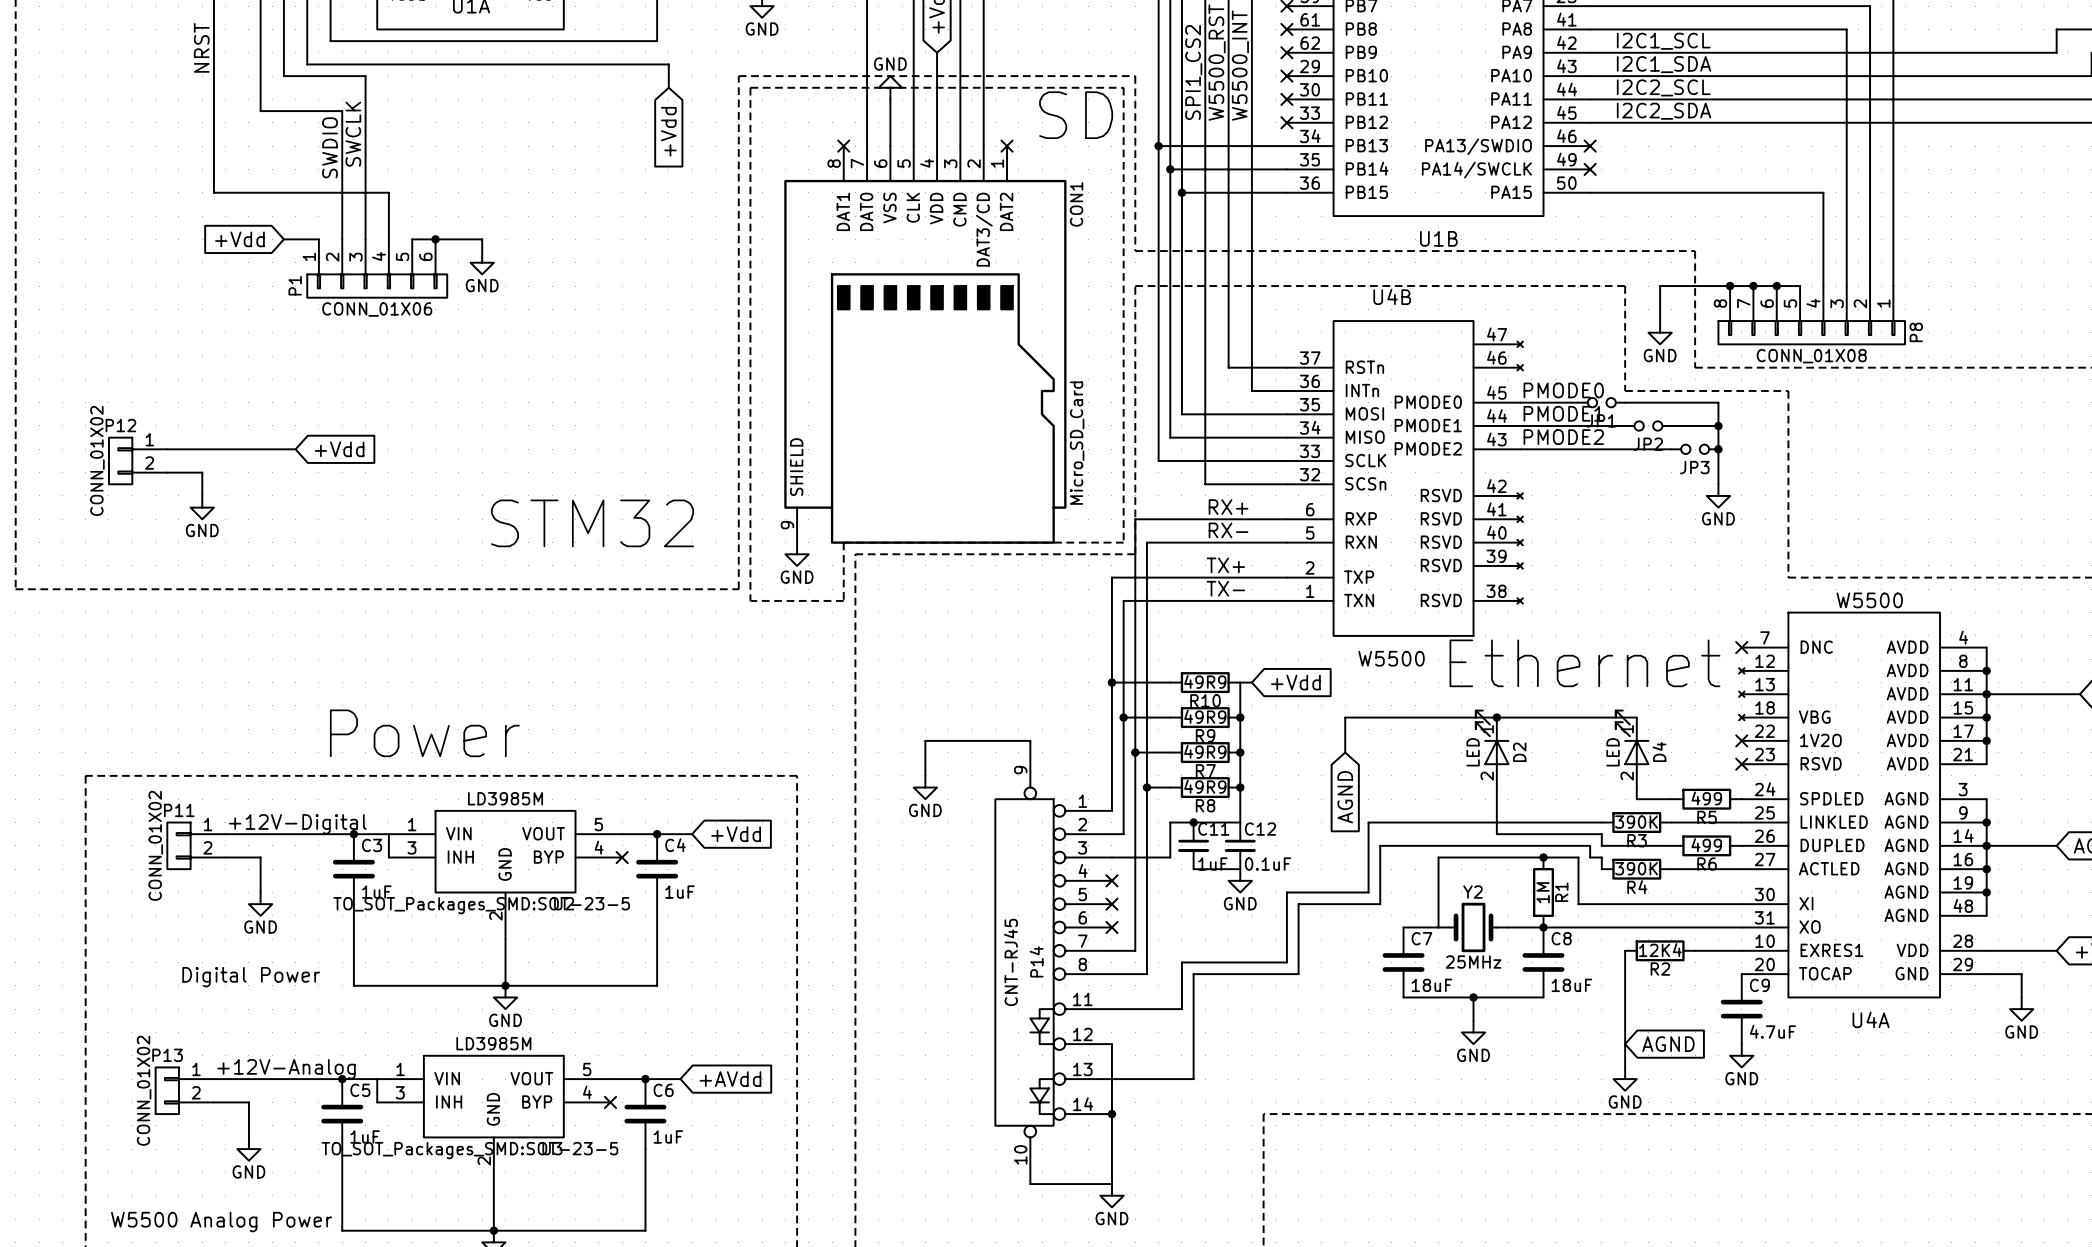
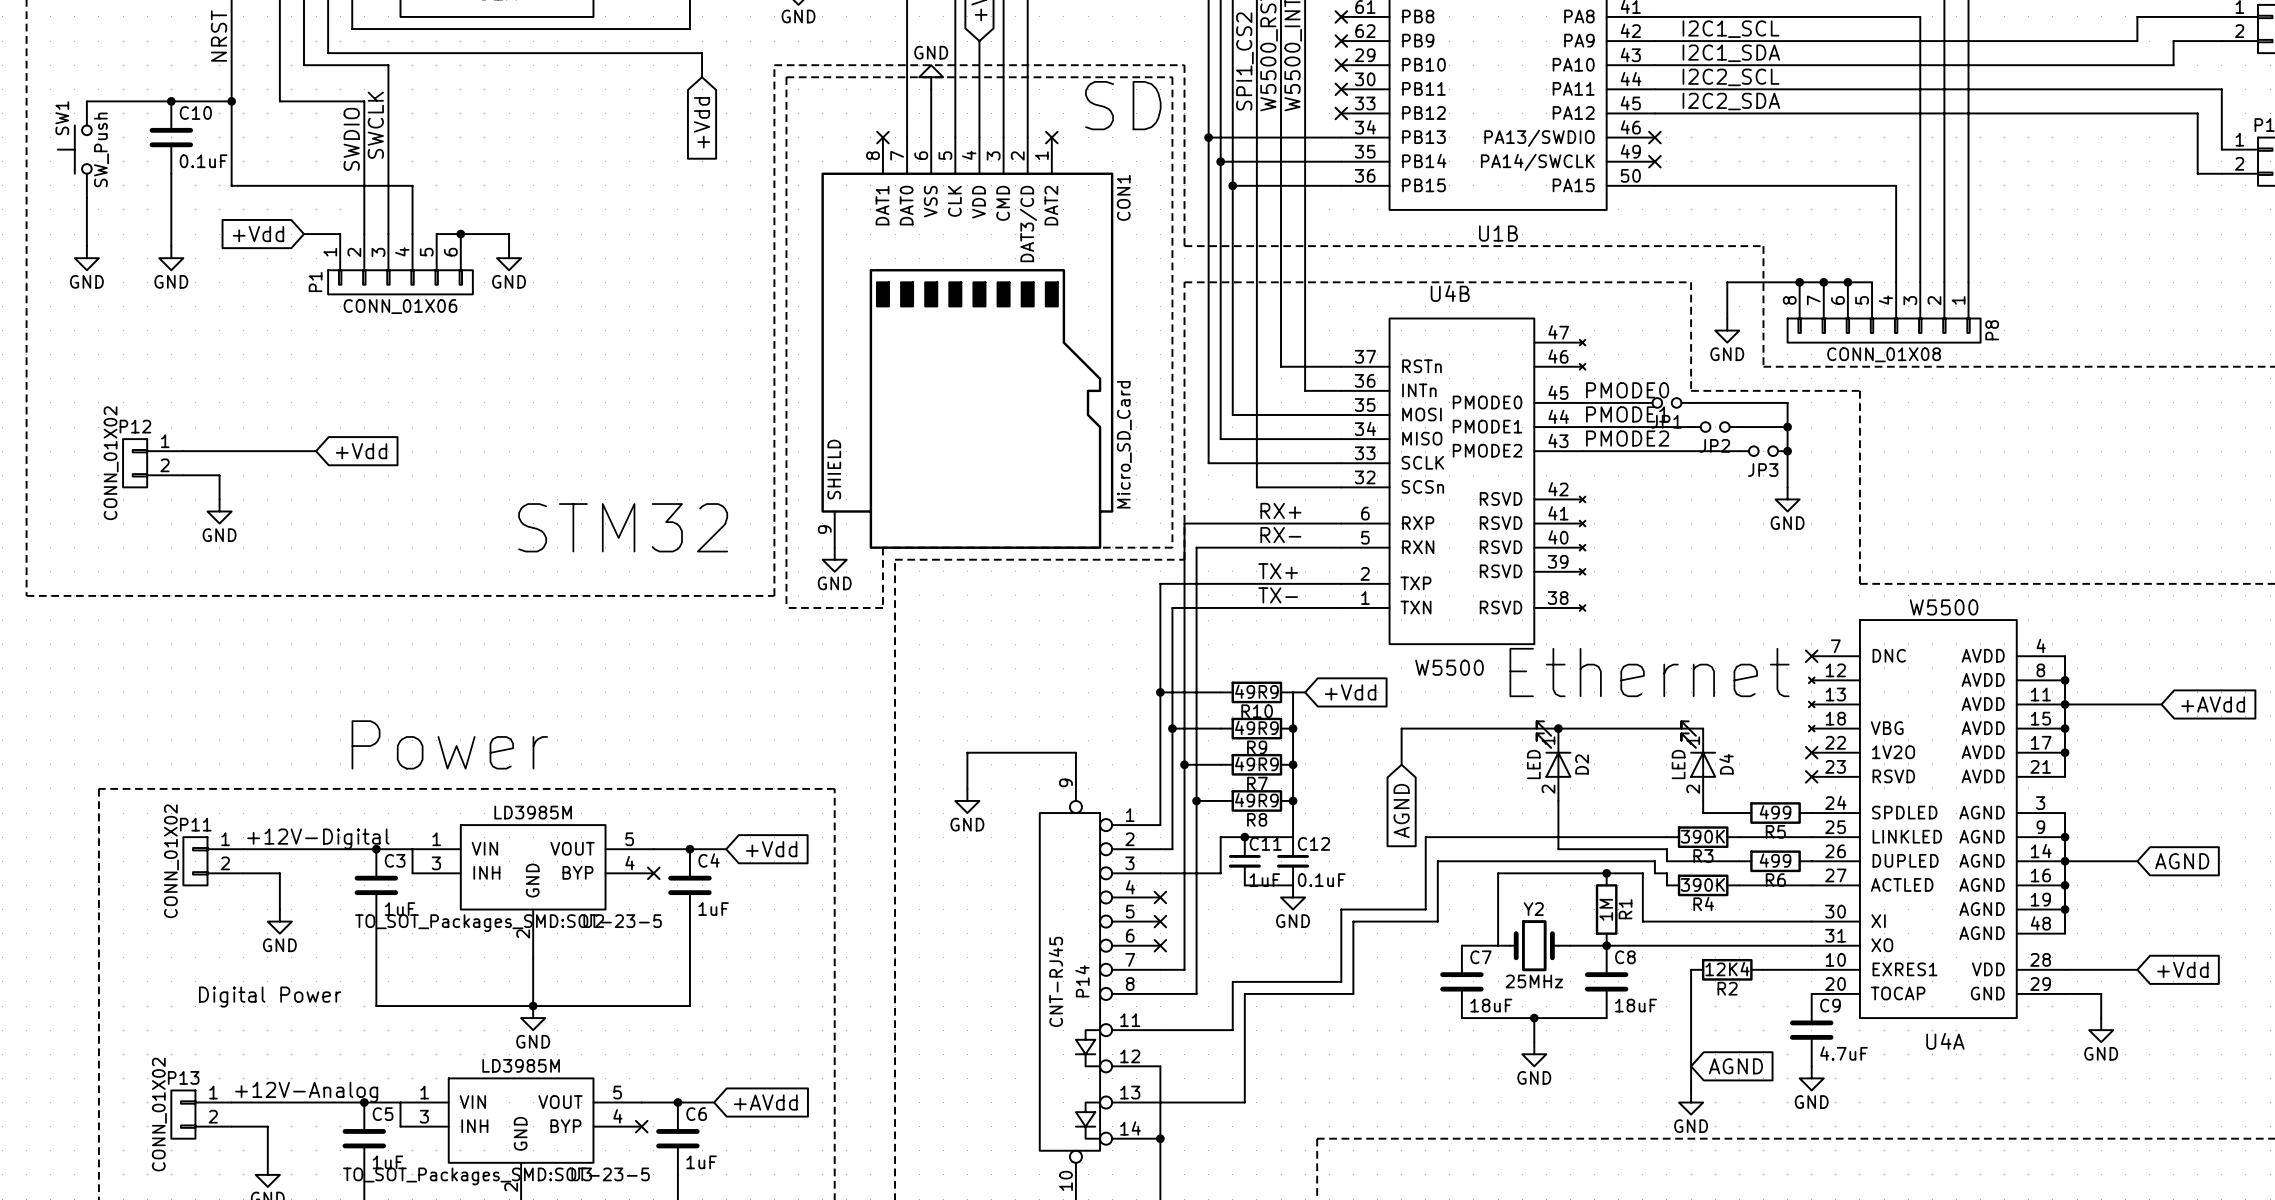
wire: none -> (86, 101) (231, 101)
junction: none -> (171, 101)
junction: none -> (231, 101)
C10: none -> 0.1uF (171, 137)
SW1: none -> SW_Push (74, 149)
wire: none -> (171, 173) (171, 246)
wire: none -> (86, 197) (86, 246)
power symbol: none -> GND (86, 258)
power symbol: none -> GND (171, 258)

